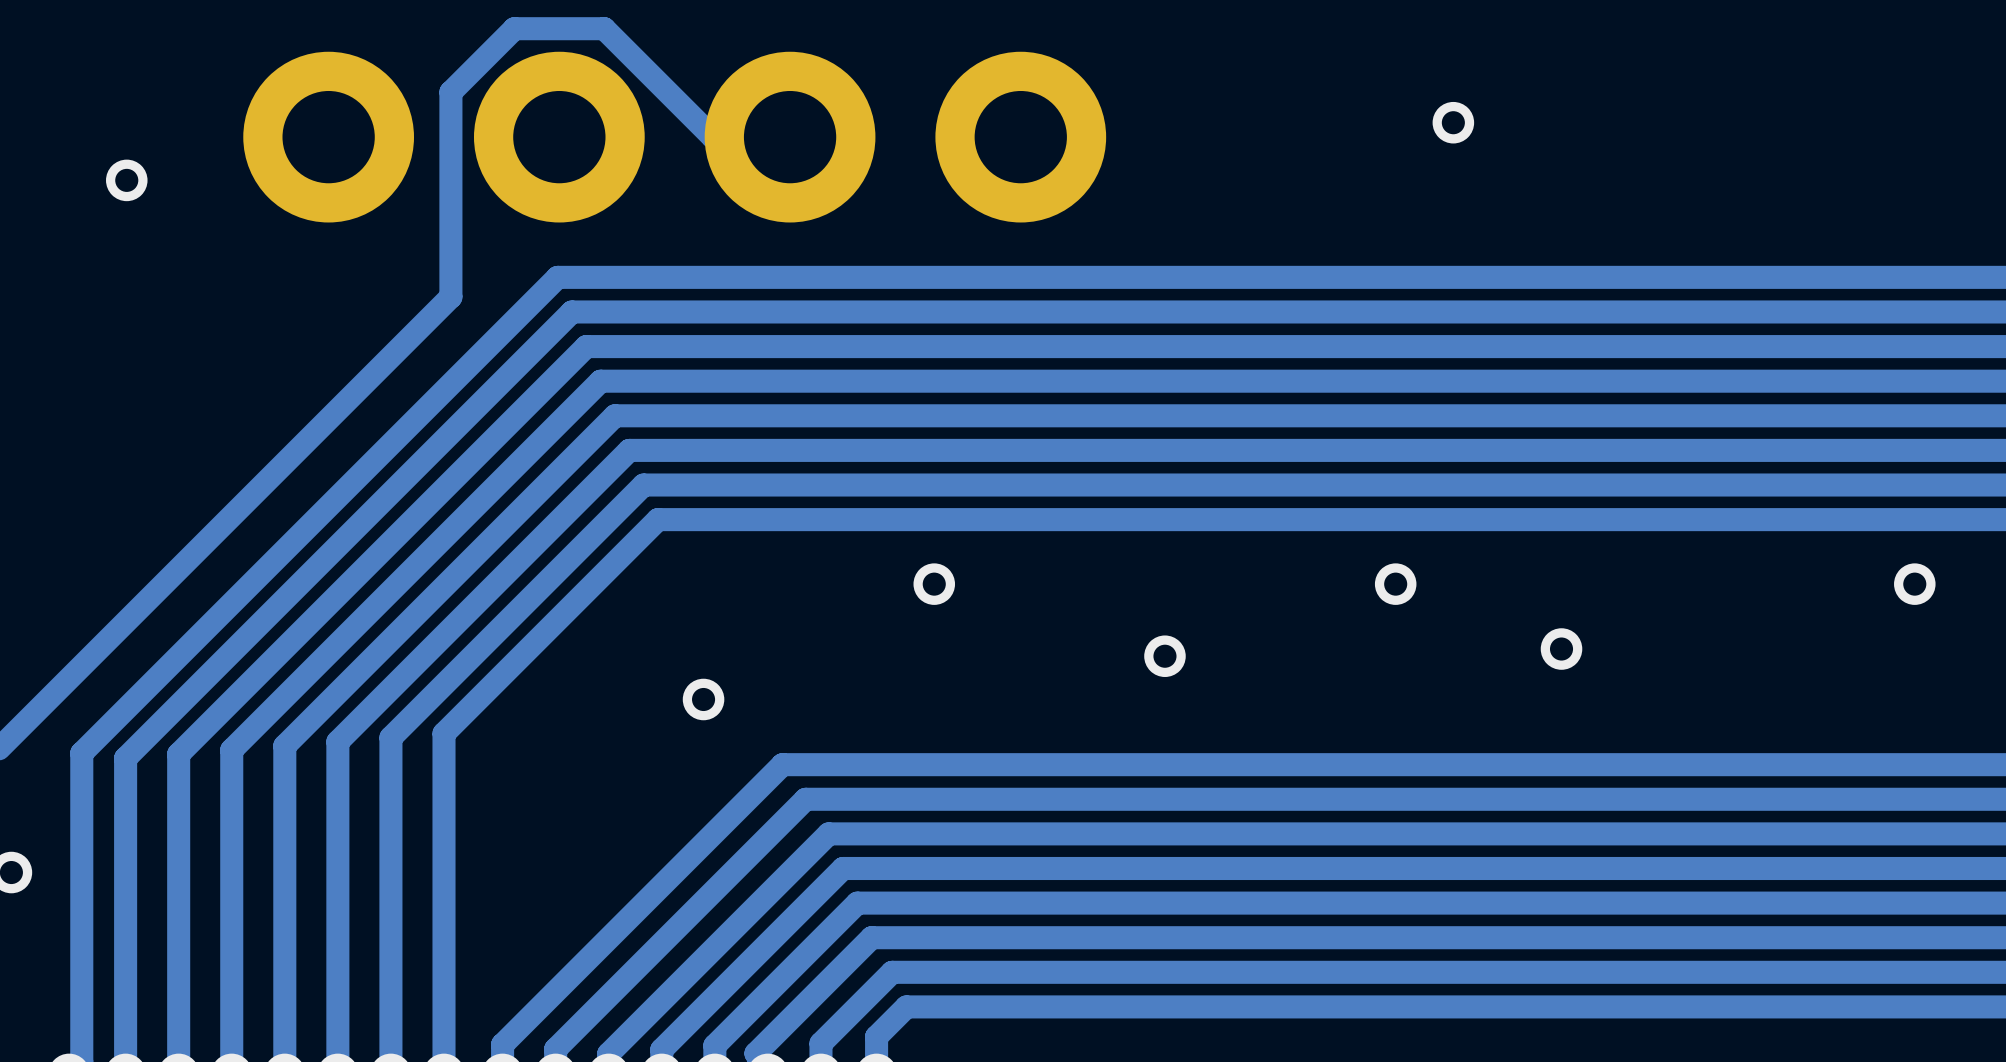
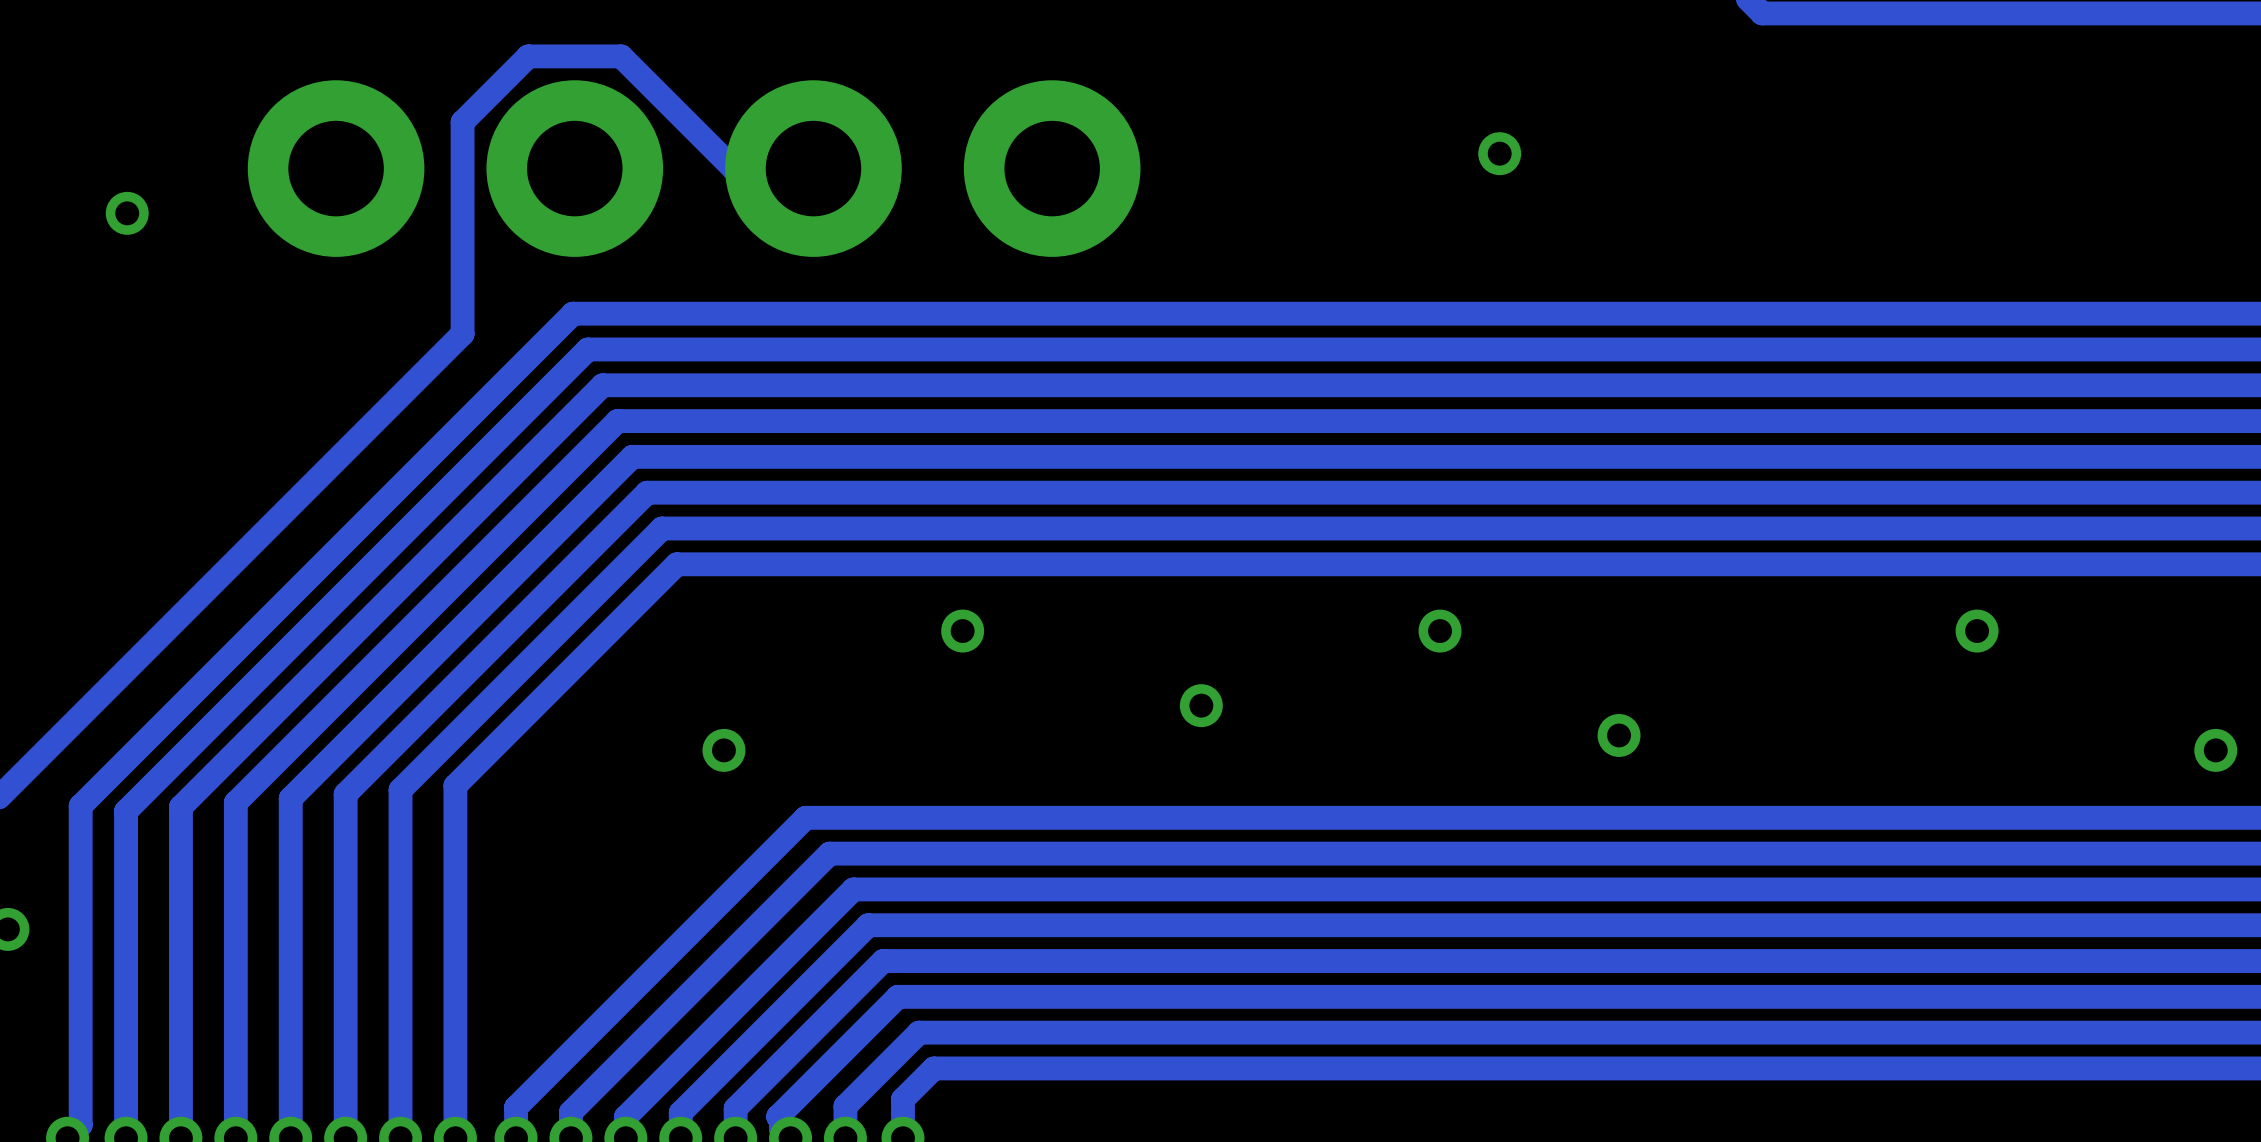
via position: (1561, 649) -> (1619, 735)

